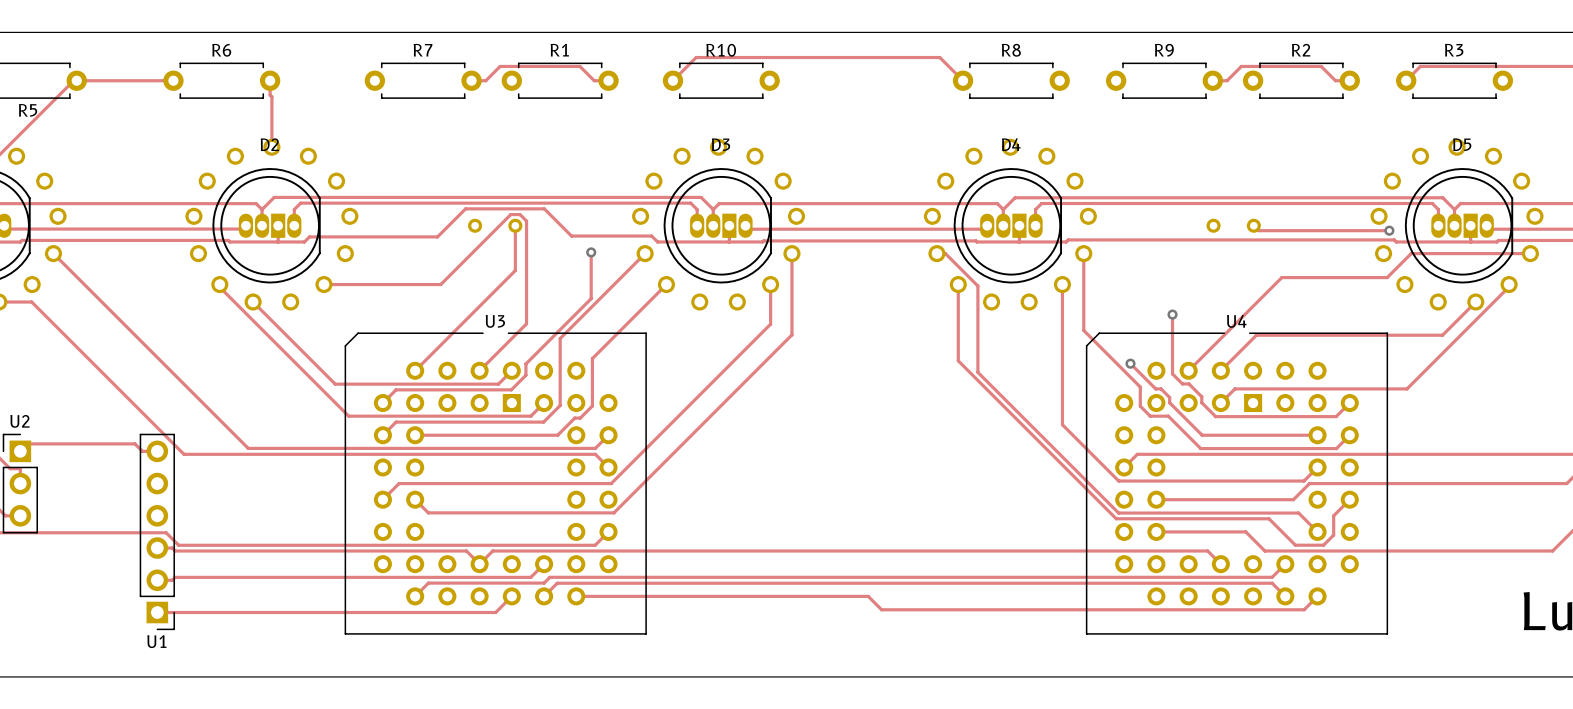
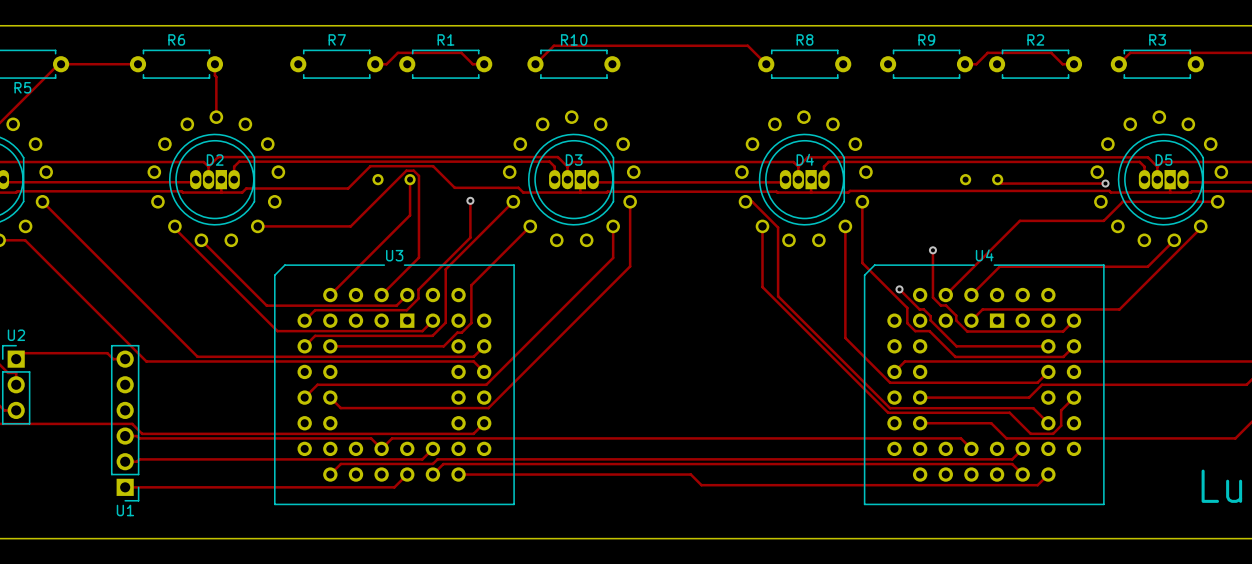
D2 name position: D2 (269, 144) -> D2 (215, 160)
D3 name position: D3 (721, 144) -> D3 (574, 160)
D4 name position: D4 (1011, 144) -> D4 (805, 159)
D5 name position: D5 (1462, 144) -> D5 (1163, 160)

